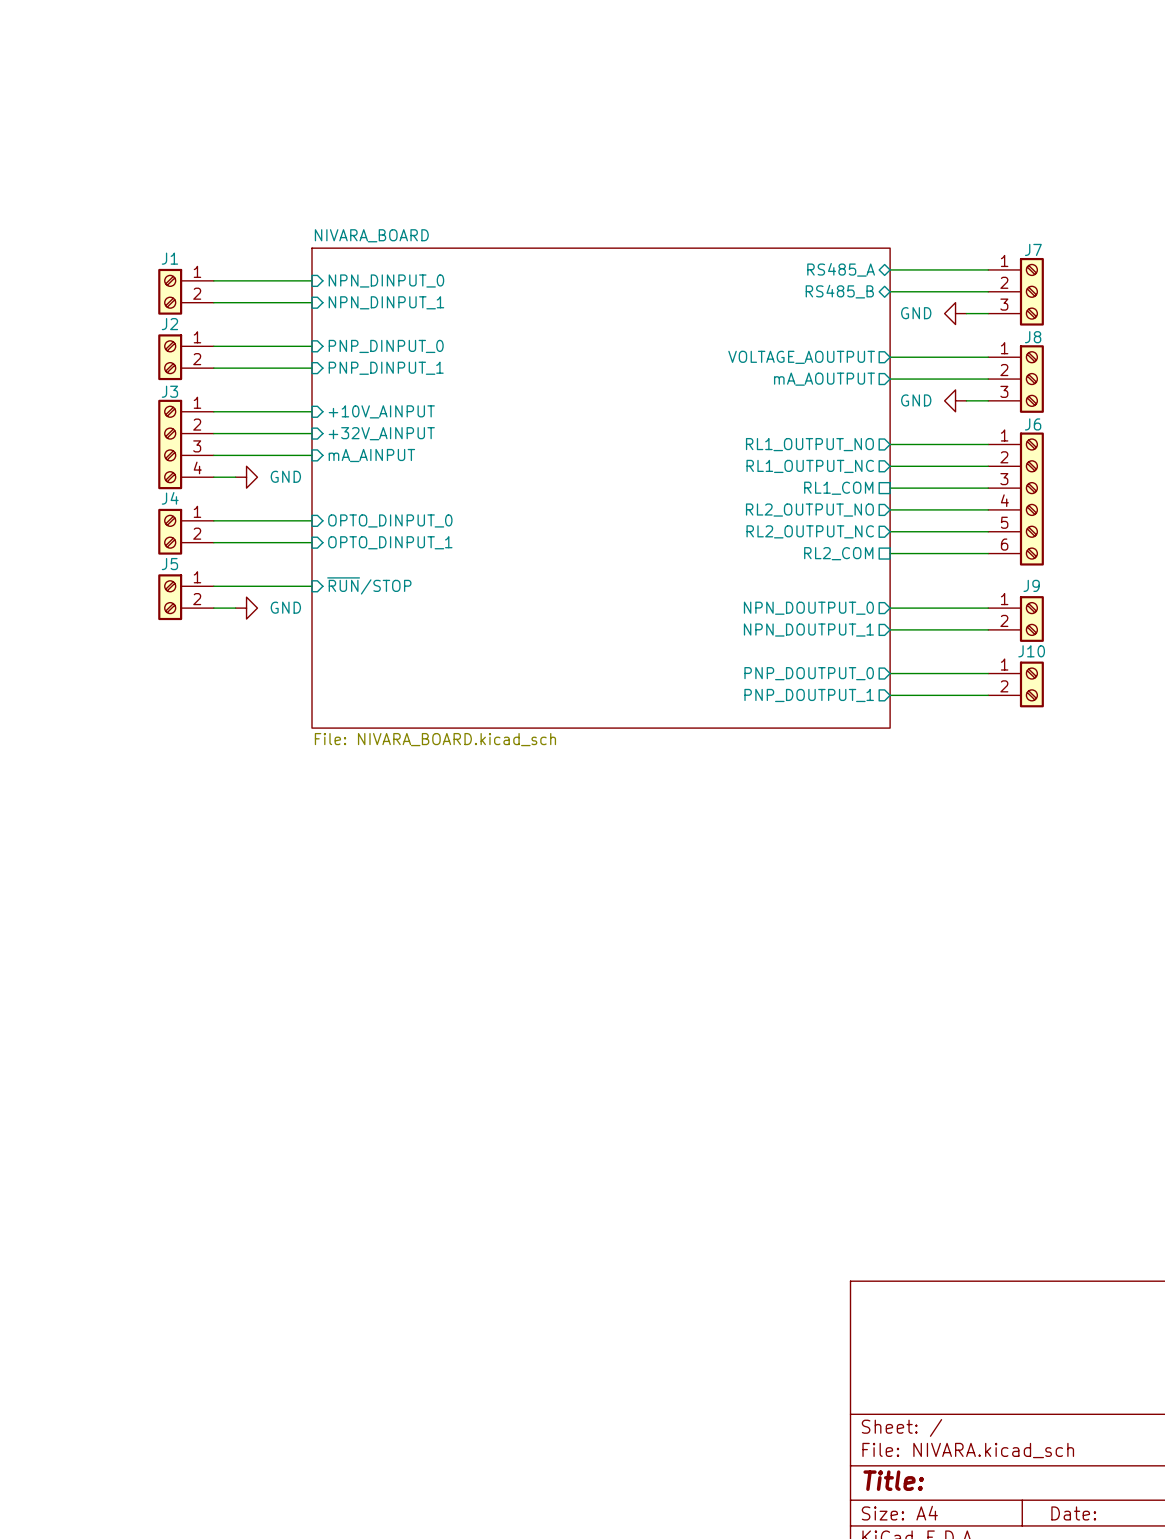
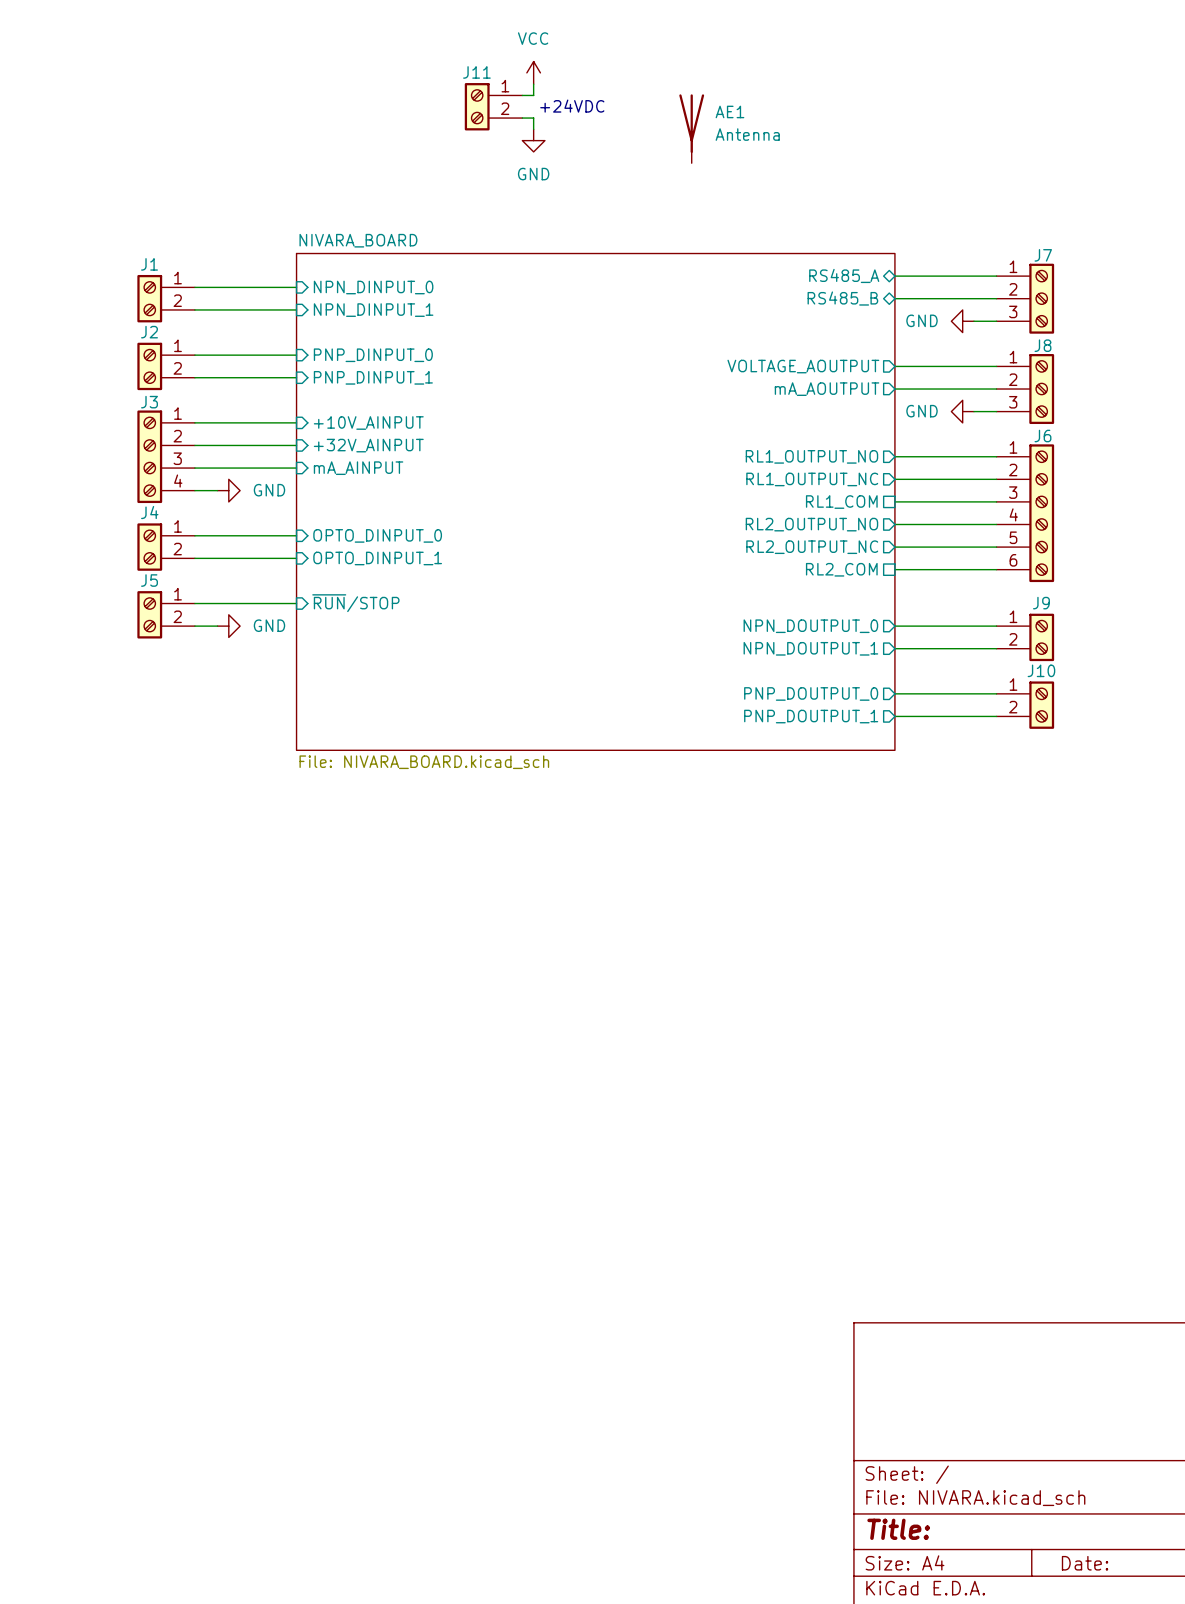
power symbol: none -> VCC (533, 72)
wire: none -> (533, 84) (533, 95) (522, 95)
text: none -> +24VDC (572, 106)
J11: none -> (493, 106)
wire: none -> (522, 118) (533, 118) (533, 129)
AE1: none -> Antenna (691, 128)
power symbol: none -> GND (533, 140)

